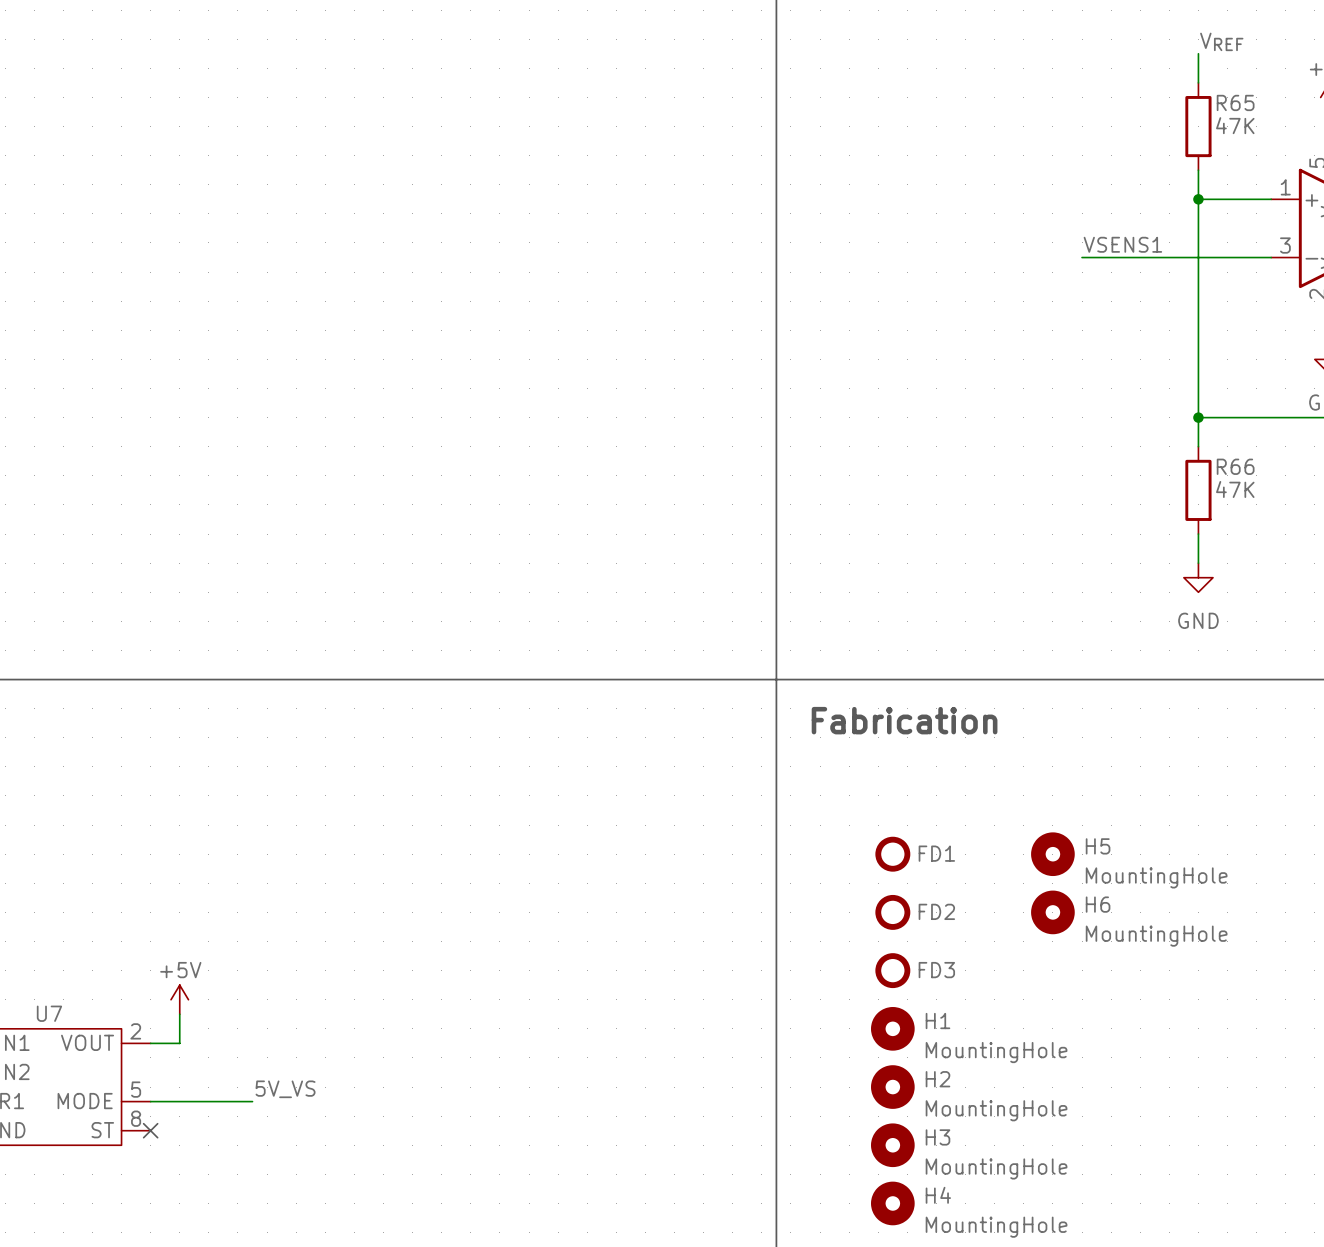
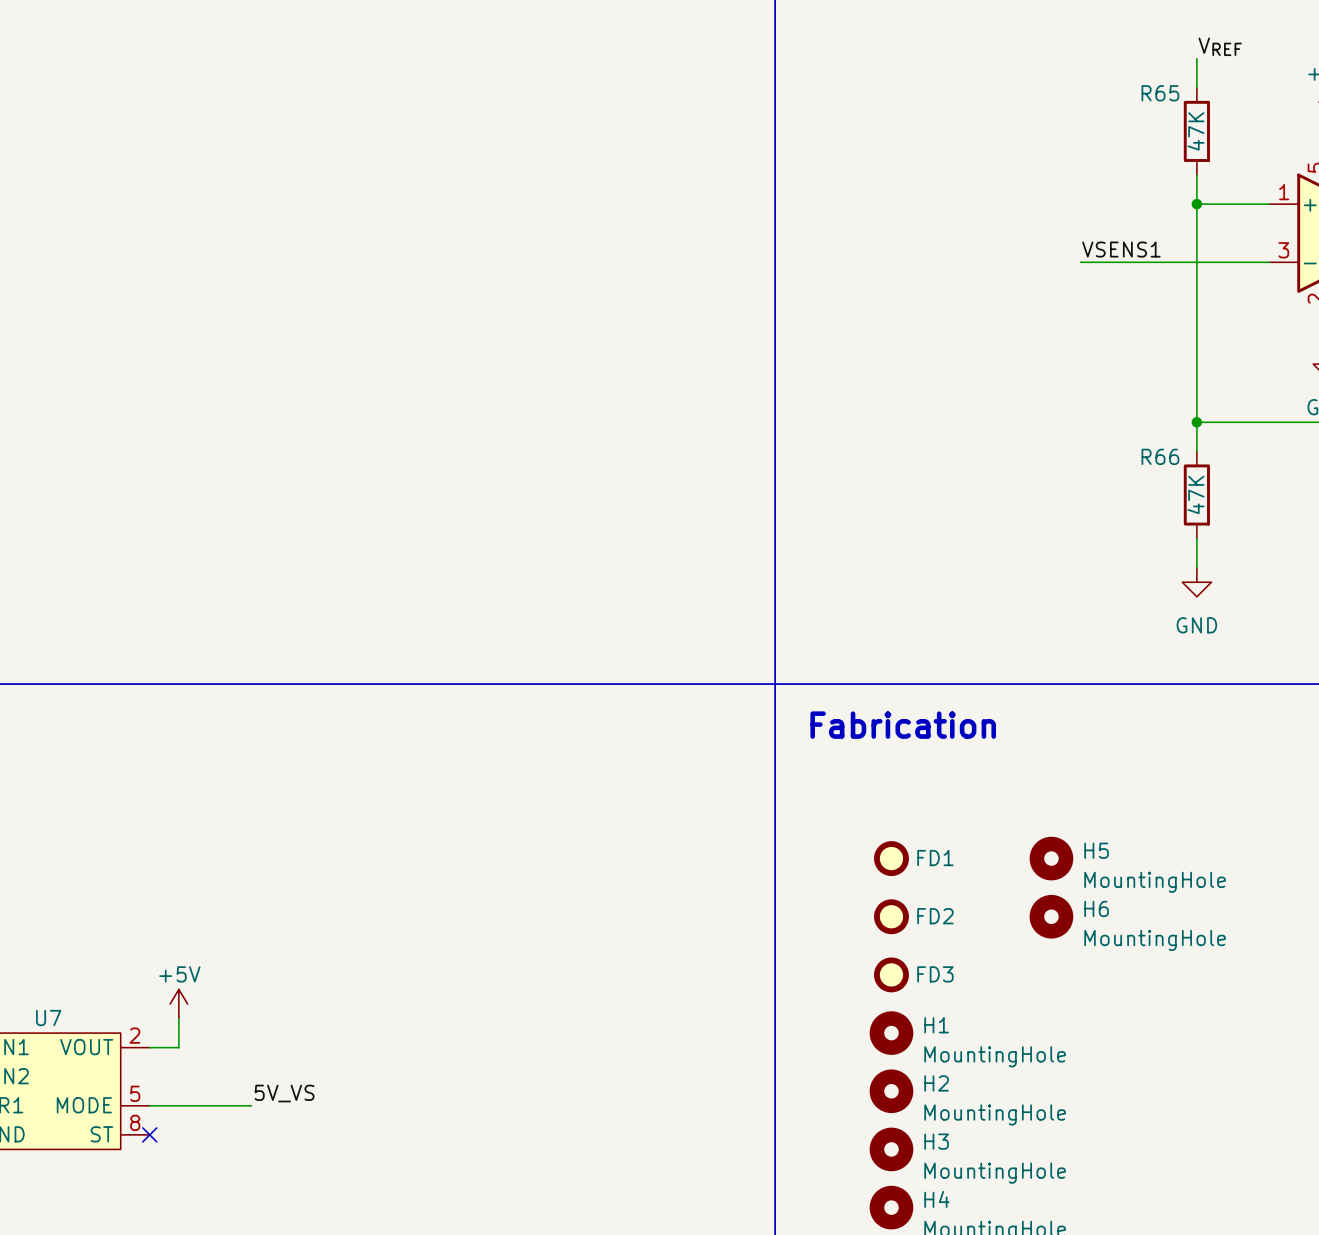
R65 name position: R65 (1235, 102) -> R65 (1160, 93)
R65 value rotation: 0° (1235, 125) -> 90° counterclockwise (1196, 131)
R66 name position: R66 (1235, 466) -> R66 (1160, 456)
R66 value rotation: 0° (1235, 489) -> 90° counterclockwise (1196, 494)

